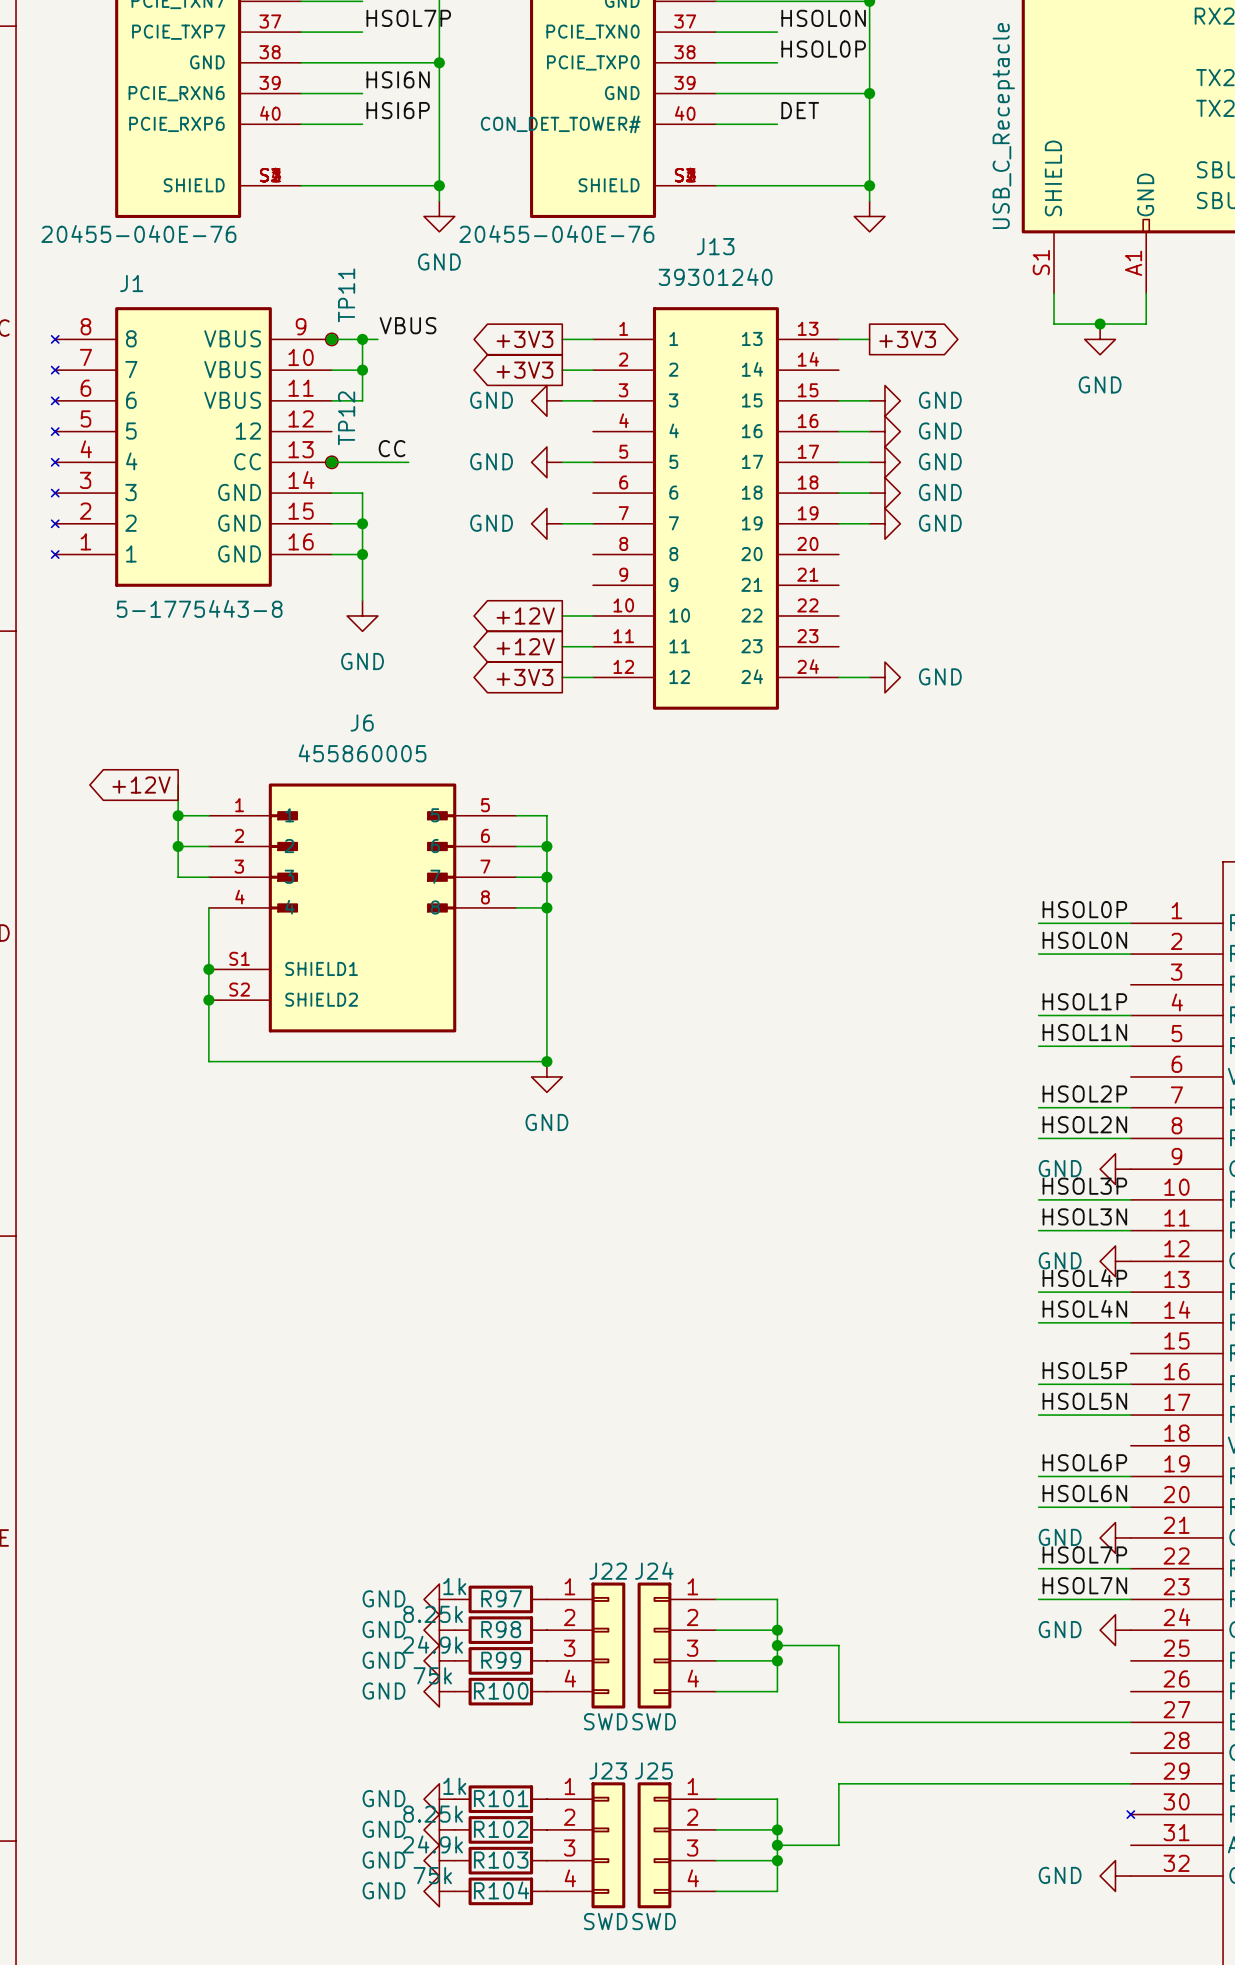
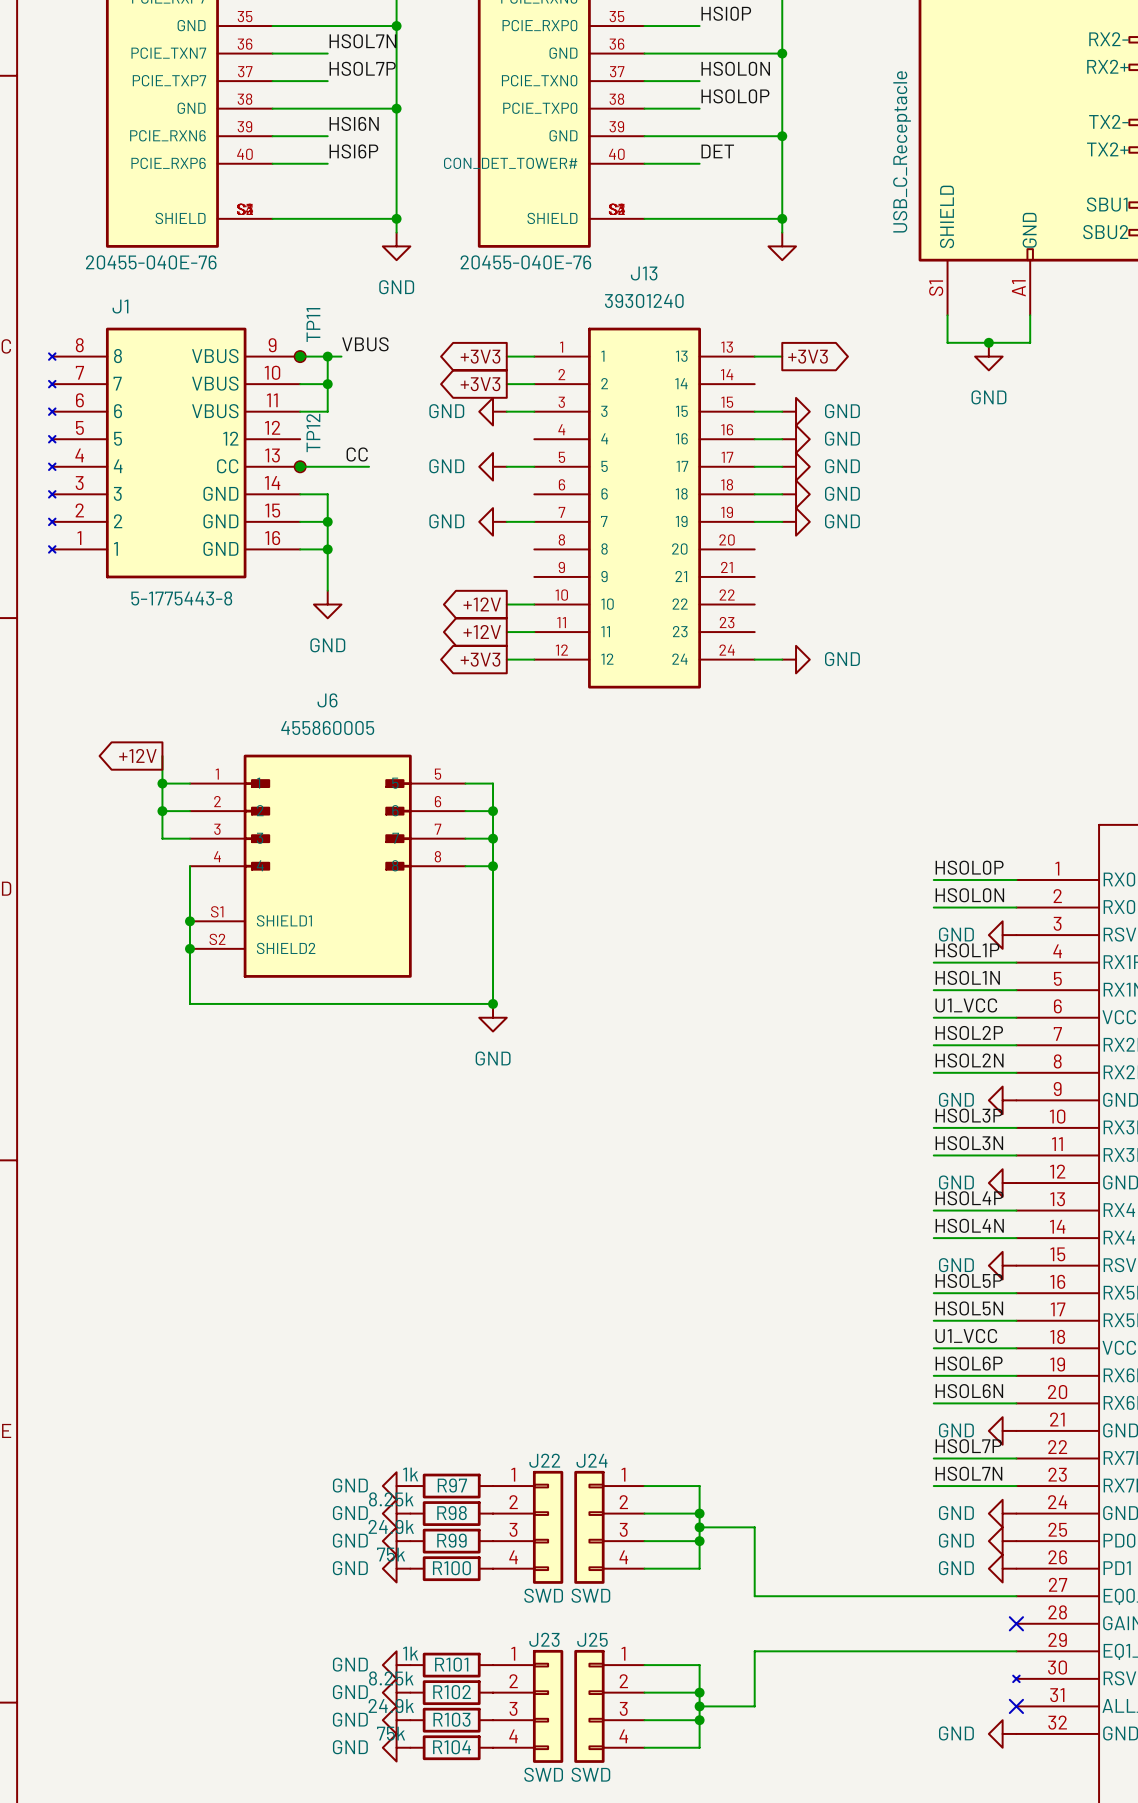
power symbol: none -> GND (1002, 935)
label: none -> U1_VCC (966, 1005)
wire: none -> (933, 1017) (1016, 1017)
power symbol: none -> GND (1002, 1265)
label: none -> U1_VCC (966, 1336)
wire: none -> (933, 1348) (1016, 1348)
power symbol: none -> GND (1002, 1541)
power symbol: none -> GND (1002, 1568)
no-connect mark: none -> (1016, 1623)
no-connect mark: none -> (1016, 1706)

